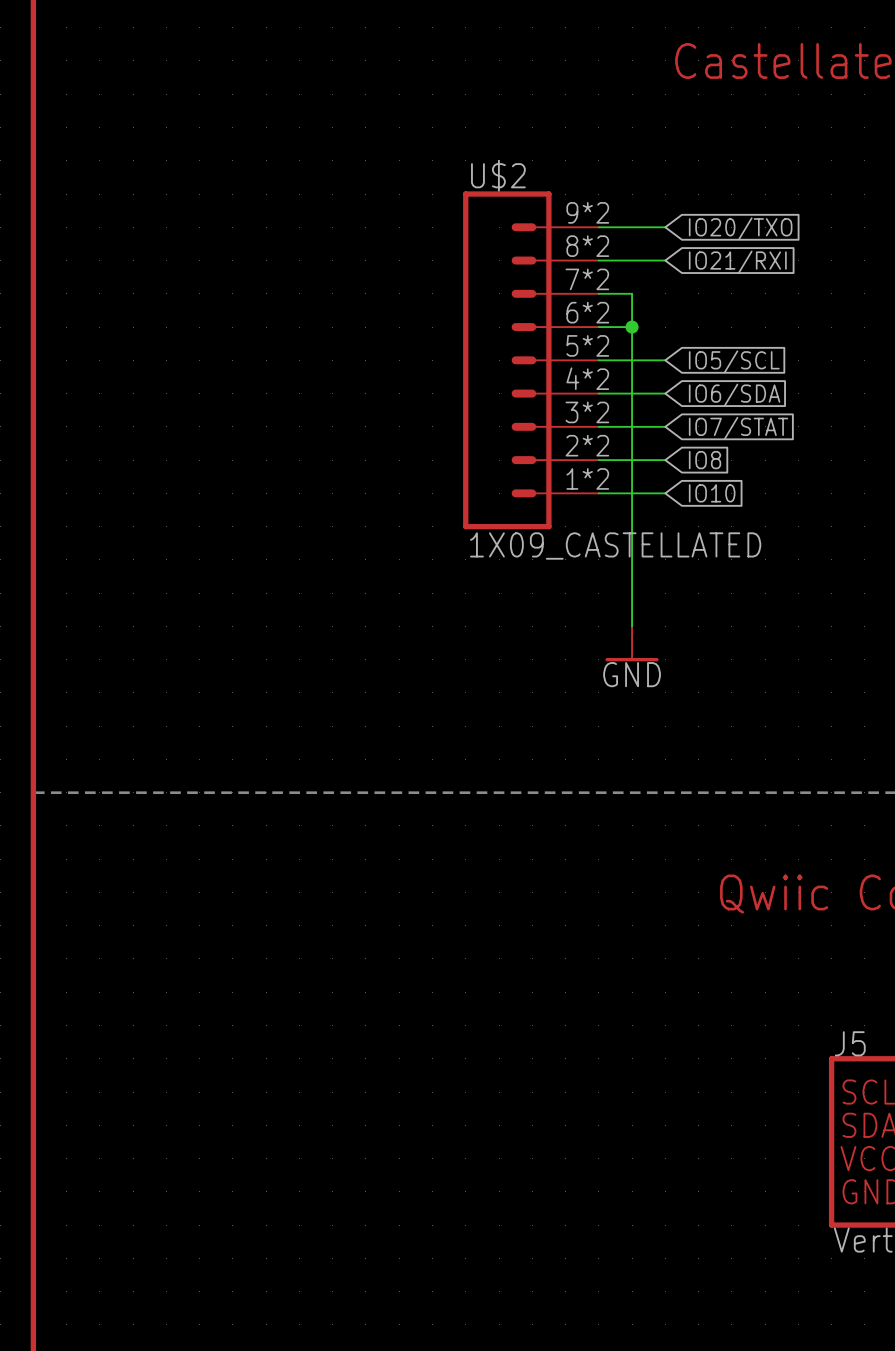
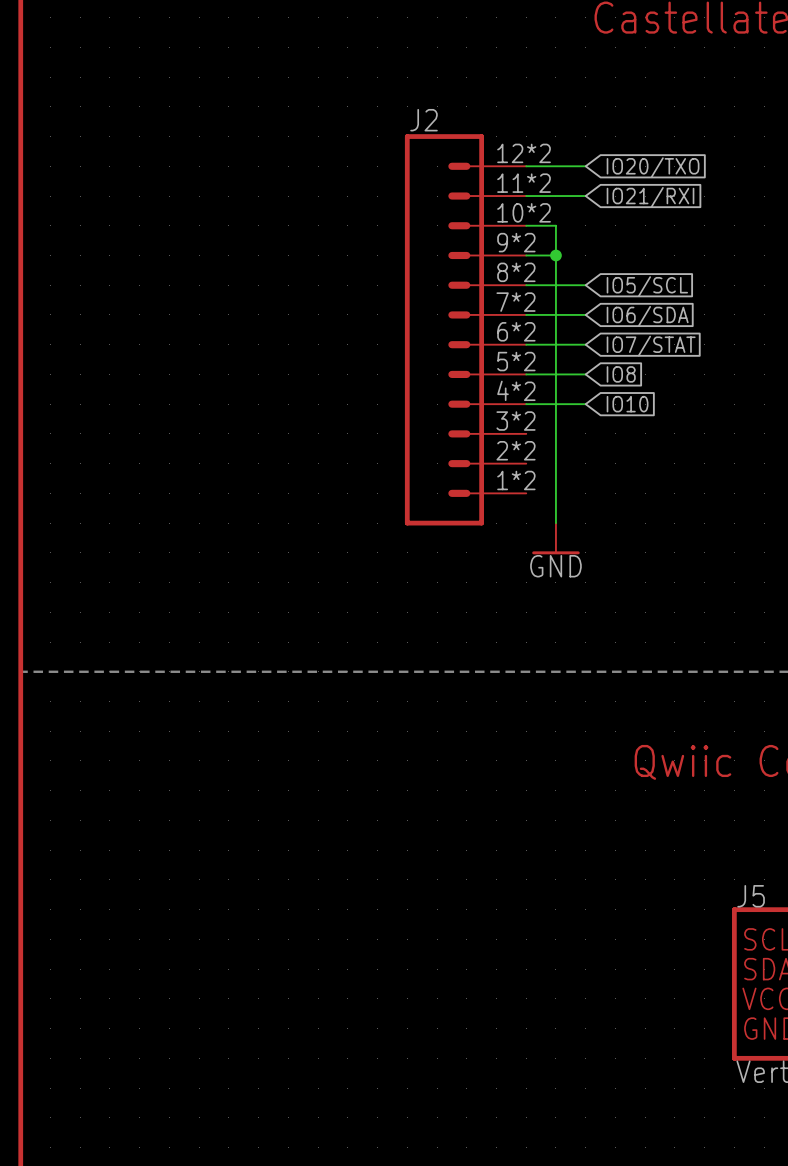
U$2: 1X09_CASTELLATED (530, 360) -> none
J2: none -> (465, 329)

